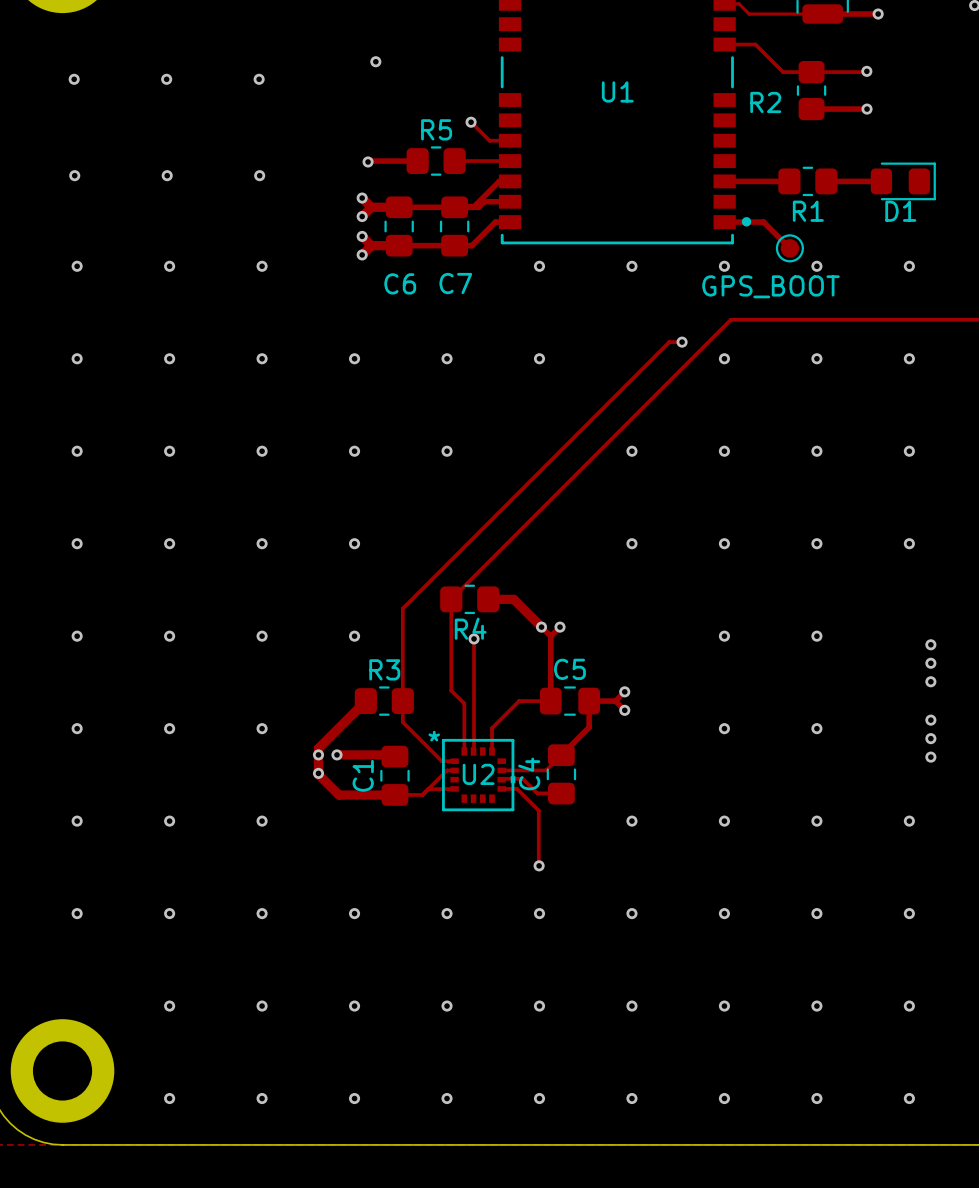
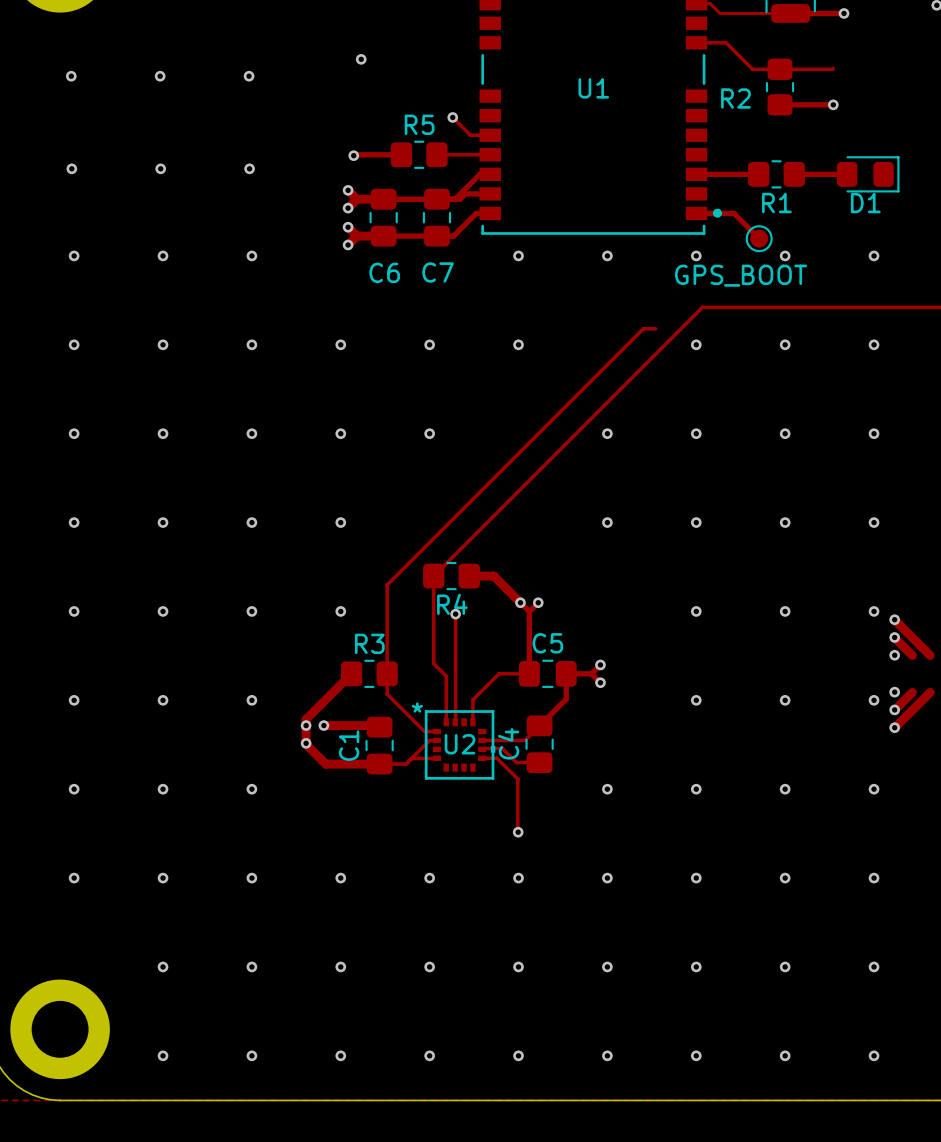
via: (866, 71) -> none
via: (682, 342) -> none
via: none -> (874, 611)
track: none -> (894, 619) (930, 655)
track: none -> (894, 637) (912, 655)
track: none -> (912, 692) (894, 710)
track: none -> (930, 692) (894, 727)
via: none -> (874, 700)

